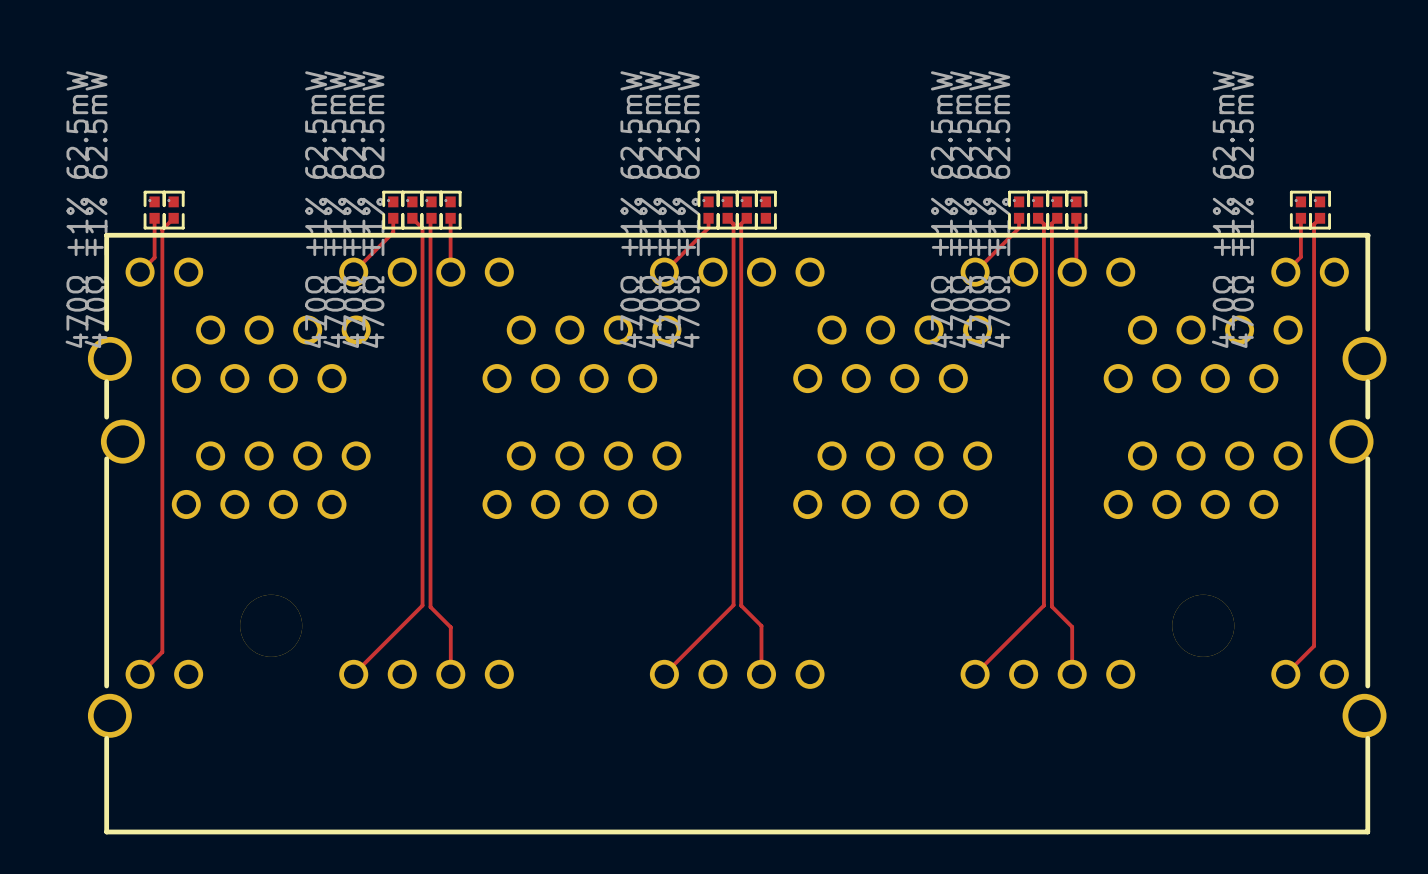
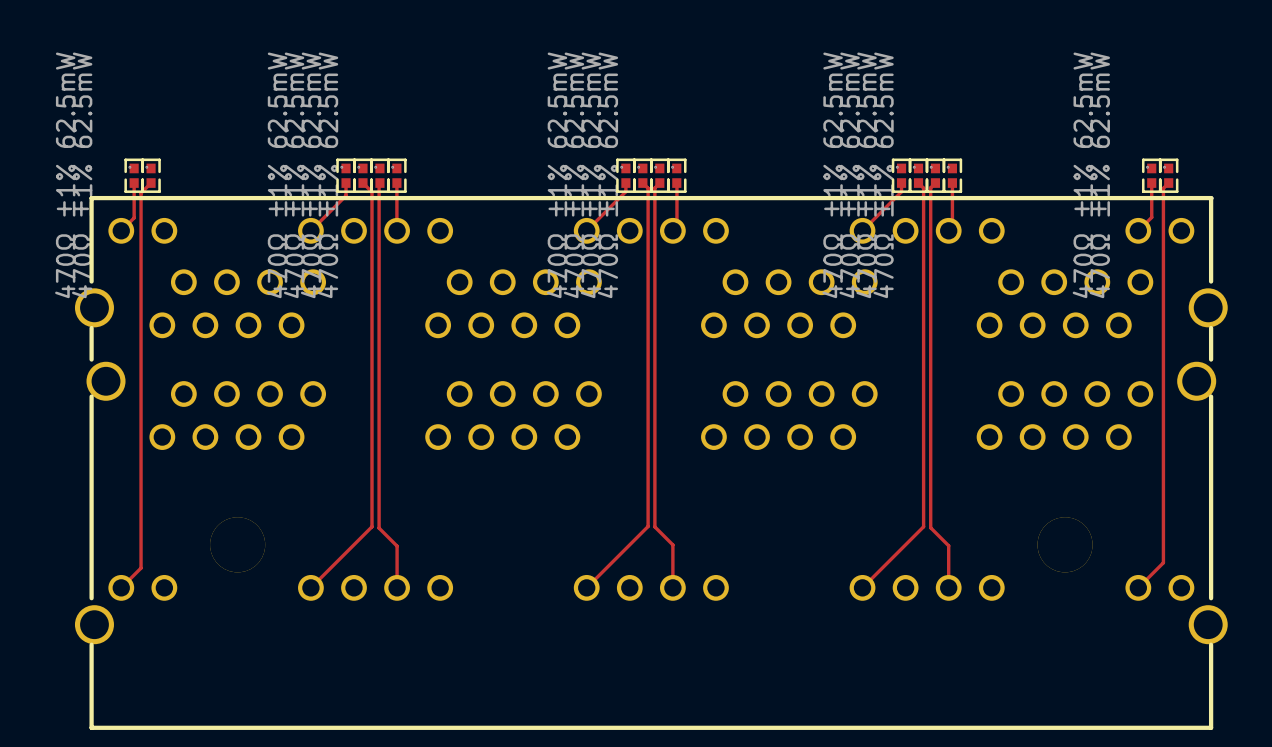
track: none -> (676, 182) (676, 226) (672, 230)

